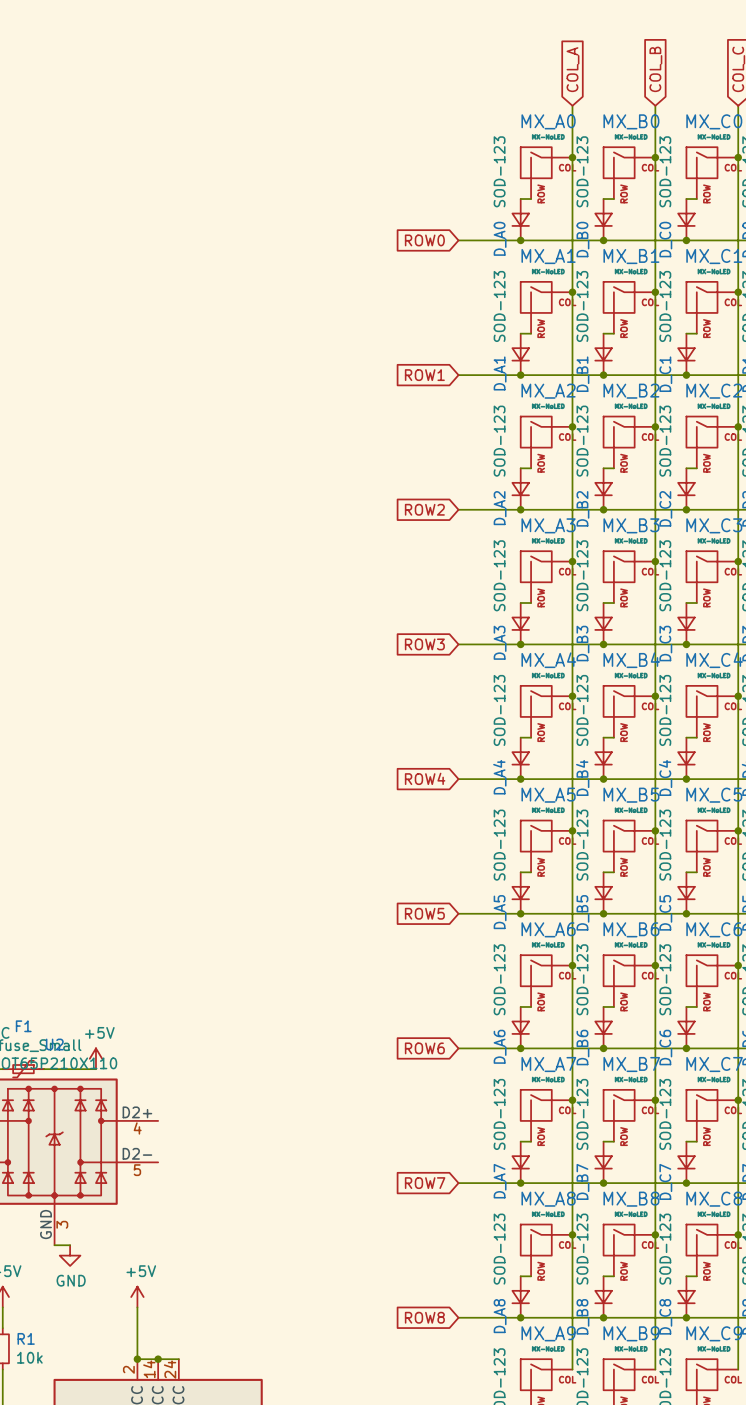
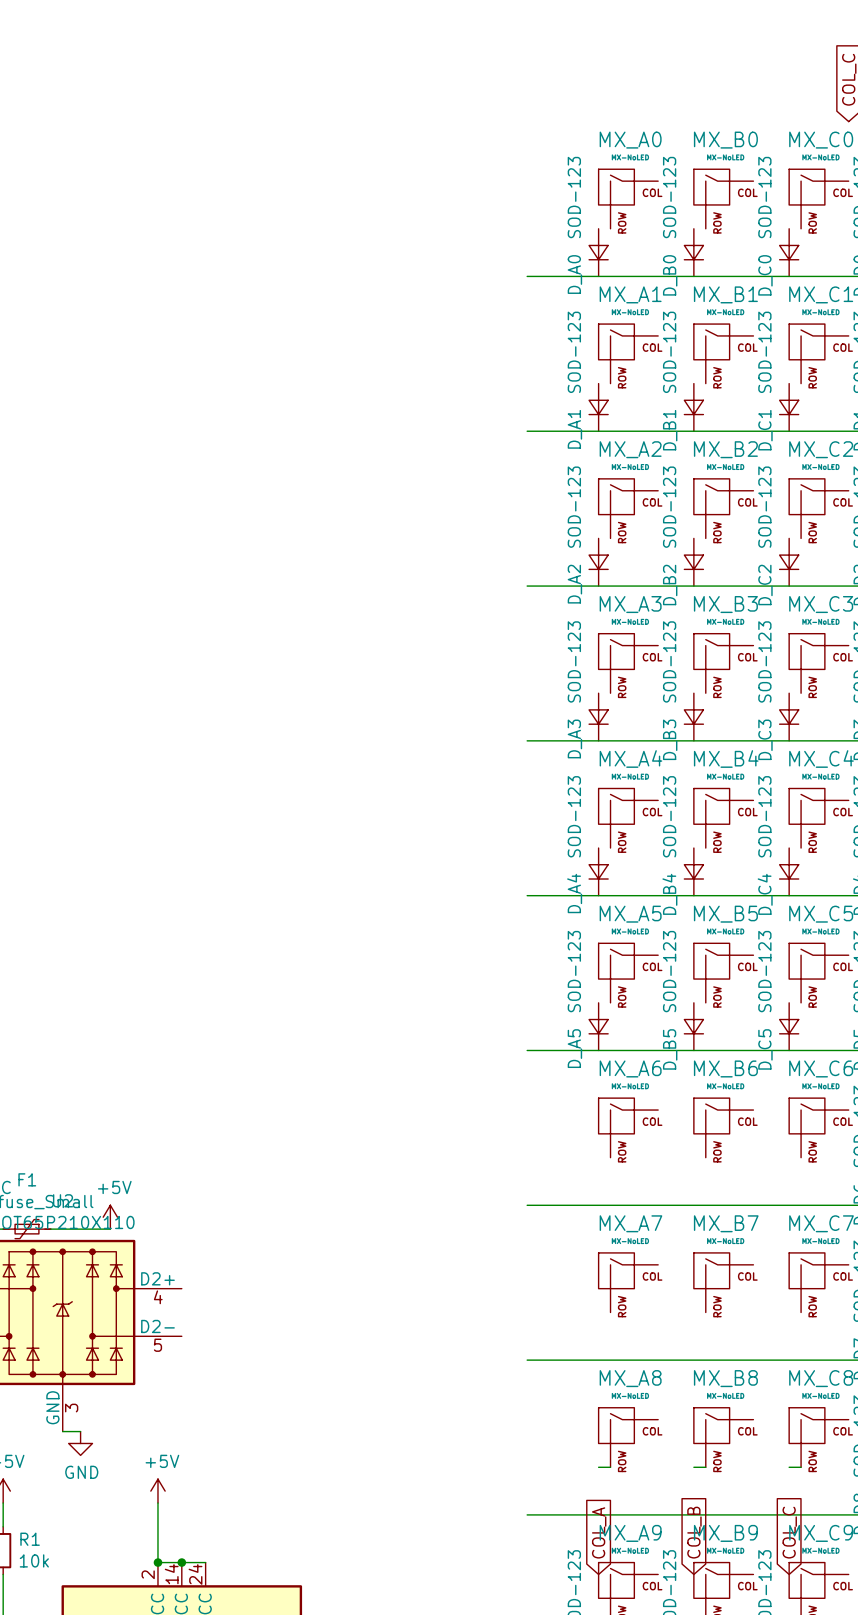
global label: COL_A (572, 69) -> none
global label: COL_B (655, 69) -> none
wire: (572, 105) (572, 1369) -> none
wire: (655, 105) (655, 1369) -> none
wire: (738, 105) (738, 1369) -> none
junction: (572, 157) -> none
junction: (655, 157) -> none
junction: (738, 157) -> none
wire: (520, 199) (531, 199) -> none
wire: (603, 199) (613, 199) -> none
wire: (686, 199) (696, 199) -> none
global label: ROW0 (424, 240) -> none
junction: (520, 240) -> none
junction: (603, 240) -> none
junction: (686, 240) -> none
junction: (572, 292) -> none
junction: (655, 292) -> none
junction: (738, 292) -> none
wire: (520, 333) (531, 333) -> none
wire: (603, 333) (613, 333) -> none
wire: (686, 333) (696, 333) -> none
global label: ROW1 (424, 375) -> none
junction: (520, 375) -> none
junction: (603, 375) -> none
junction: (686, 375) -> none
junction: (572, 426) -> none
junction: (655, 426) -> none
junction: (738, 426) -> none
wire: (520, 468) (531, 468) -> none
wire: (603, 468) (613, 468) -> none
wire: (686, 468) (696, 468) -> none
global label: ROW2 (424, 509) -> none
junction: (520, 509) -> none
junction: (603, 509) -> none
junction: (686, 509) -> none
junction: (572, 561) -> none
junction: (655, 561) -> none
junction: (738, 561) -> none
wire: (520, 603) (531, 603) -> none
wire: (603, 603) (613, 603) -> none
wire: (686, 603) (696, 603) -> none
global label: ROW3 (424, 644) -> none
junction: (520, 644) -> none
junction: (603, 644) -> none
junction: (686, 644) -> none
junction: (572, 696) -> none
junction: (655, 696) -> none
junction: (738, 696) -> none
wire: (520, 737) (531, 737) -> none
wire: (603, 737) (613, 737) -> none
wire: (686, 737) (696, 737) -> none
global label: ROW4 (425, 778) -> none
junction: (520, 779) -> none
junction: (603, 779) -> none
junction: (686, 779) -> none
junction: (572, 830) -> none
junction: (655, 830) -> none
junction: (738, 830) -> none
wire: (520, 872) (531, 872) -> none
wire: (603, 872) (613, 872) -> none
wire: (686, 872) (696, 872) -> none
global label: ROW5 (424, 913) -> none
junction: (520, 913) -> none
junction: (603, 913) -> none
junction: (686, 913) -> none
junction: (572, 965) -> none
junction: (655, 965) -> none
junction: (738, 965) -> none
wire: (520, 1006) (531, 1006) -> none
wire: (603, 1006) (613, 1006) -> none
wire: (686, 1006) (696, 1006) -> none
D_A6: SOD-123 (520, 1027) -> none
D_B6: SOD-123 (603, 1027) -> none
D_C6: SOD-123 (686, 1027) -> none
global label: ROW6 (424, 1048) -> none
junction: (520, 1048) -> none
junction: (603, 1048) -> none
junction: (686, 1048) -> none
junction: (572, 1100) -> none
junction: (655, 1100) -> none
junction: (738, 1100) -> none
wire: (520, 1141) (531, 1141) -> none
wire: (603, 1141) (613, 1141) -> none
wire: (686, 1141) (696, 1141) -> none
D_A7: SOD-123 (520, 1162) -> none
D_B7: SOD-123 (603, 1162) -> none
D_C7: SOD-123 (686, 1162) -> none
global label: ROW7 (425, 1183) -> none
junction: (520, 1183) -> none
junction: (603, 1183) -> none
junction: (686, 1183) -> none
junction: (572, 1234) -> none
junction: (655, 1234) -> none
junction: (738, 1234) -> none
D_A8: SOD-123 (520, 1297) -> none
D_B8: SOD-123 (603, 1297) -> none
D_C8: SOD-123 (686, 1297) -> none
global label: ROW8 (424, 1317) -> none
junction: (520, 1317) -> none
junction: (603, 1317) -> none
junction: (686, 1317) -> none
global label: none -> COL_A (599, 1532)
global label: none -> COL_B (694, 1532)
global label: none -> COL_C (789, 1532)

